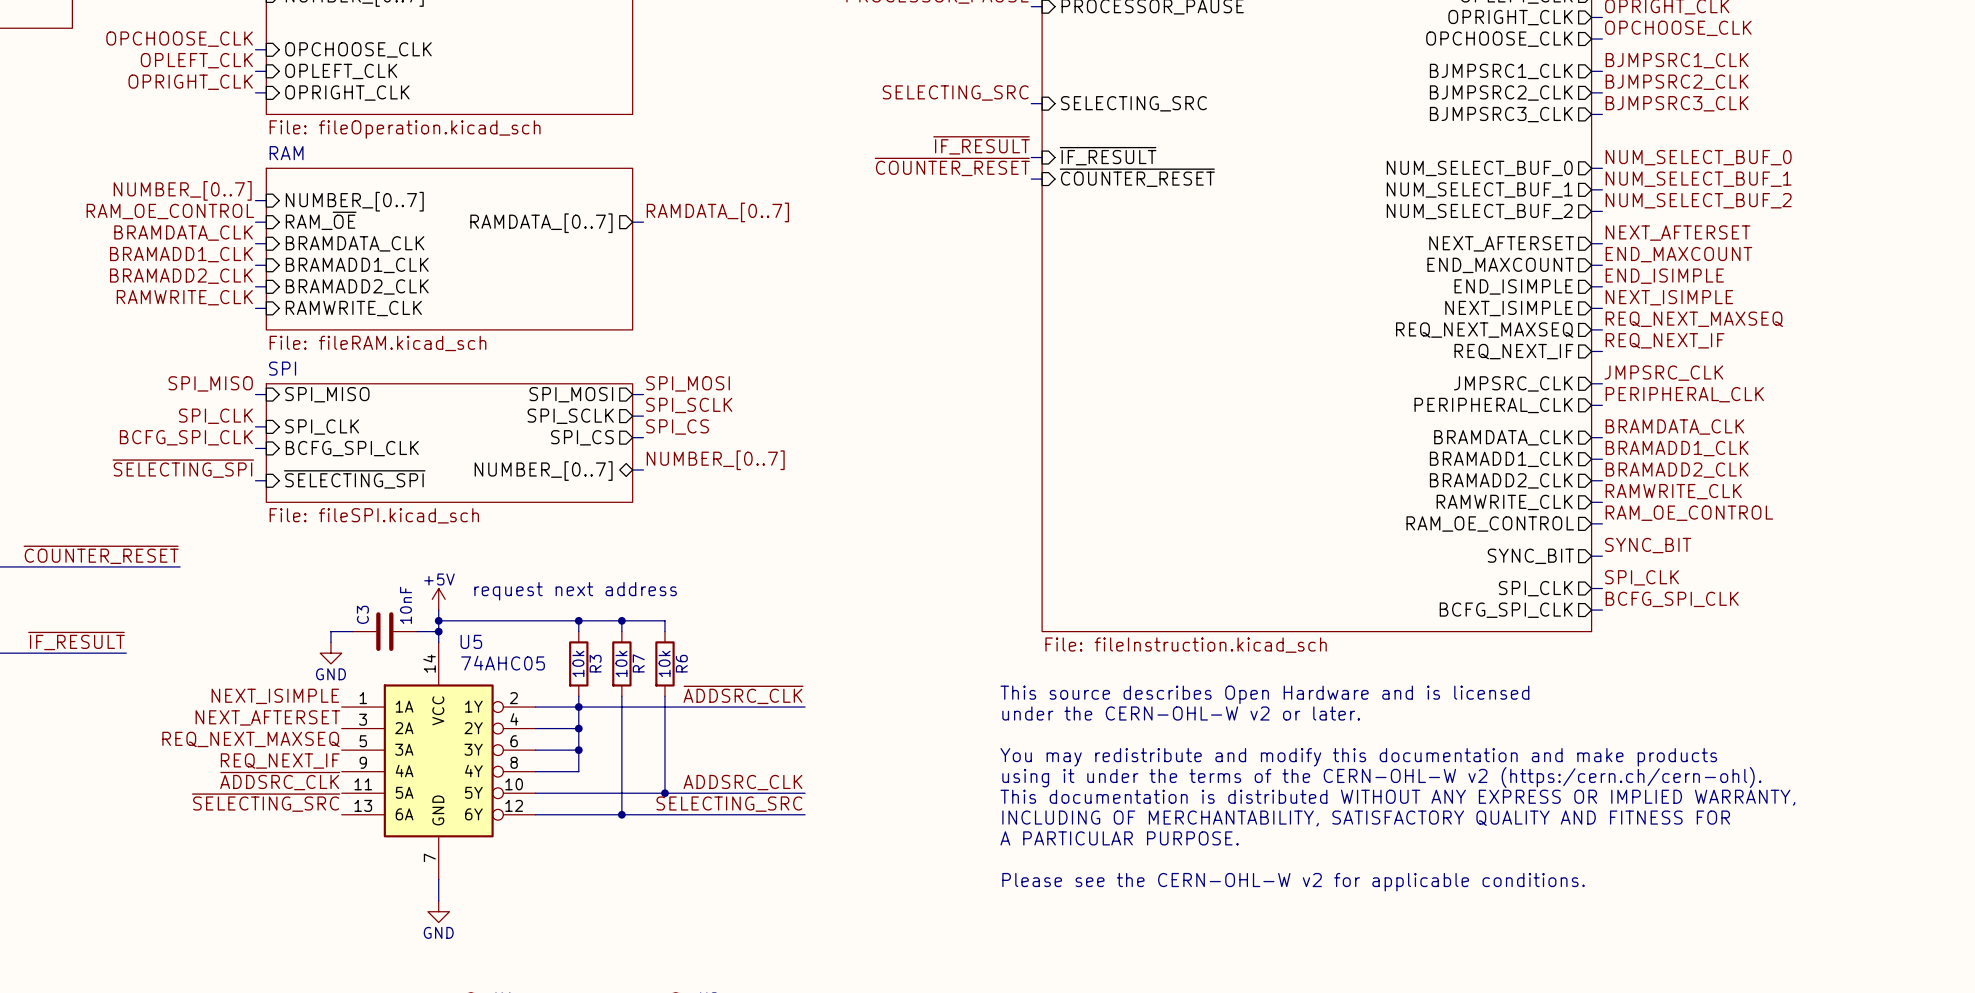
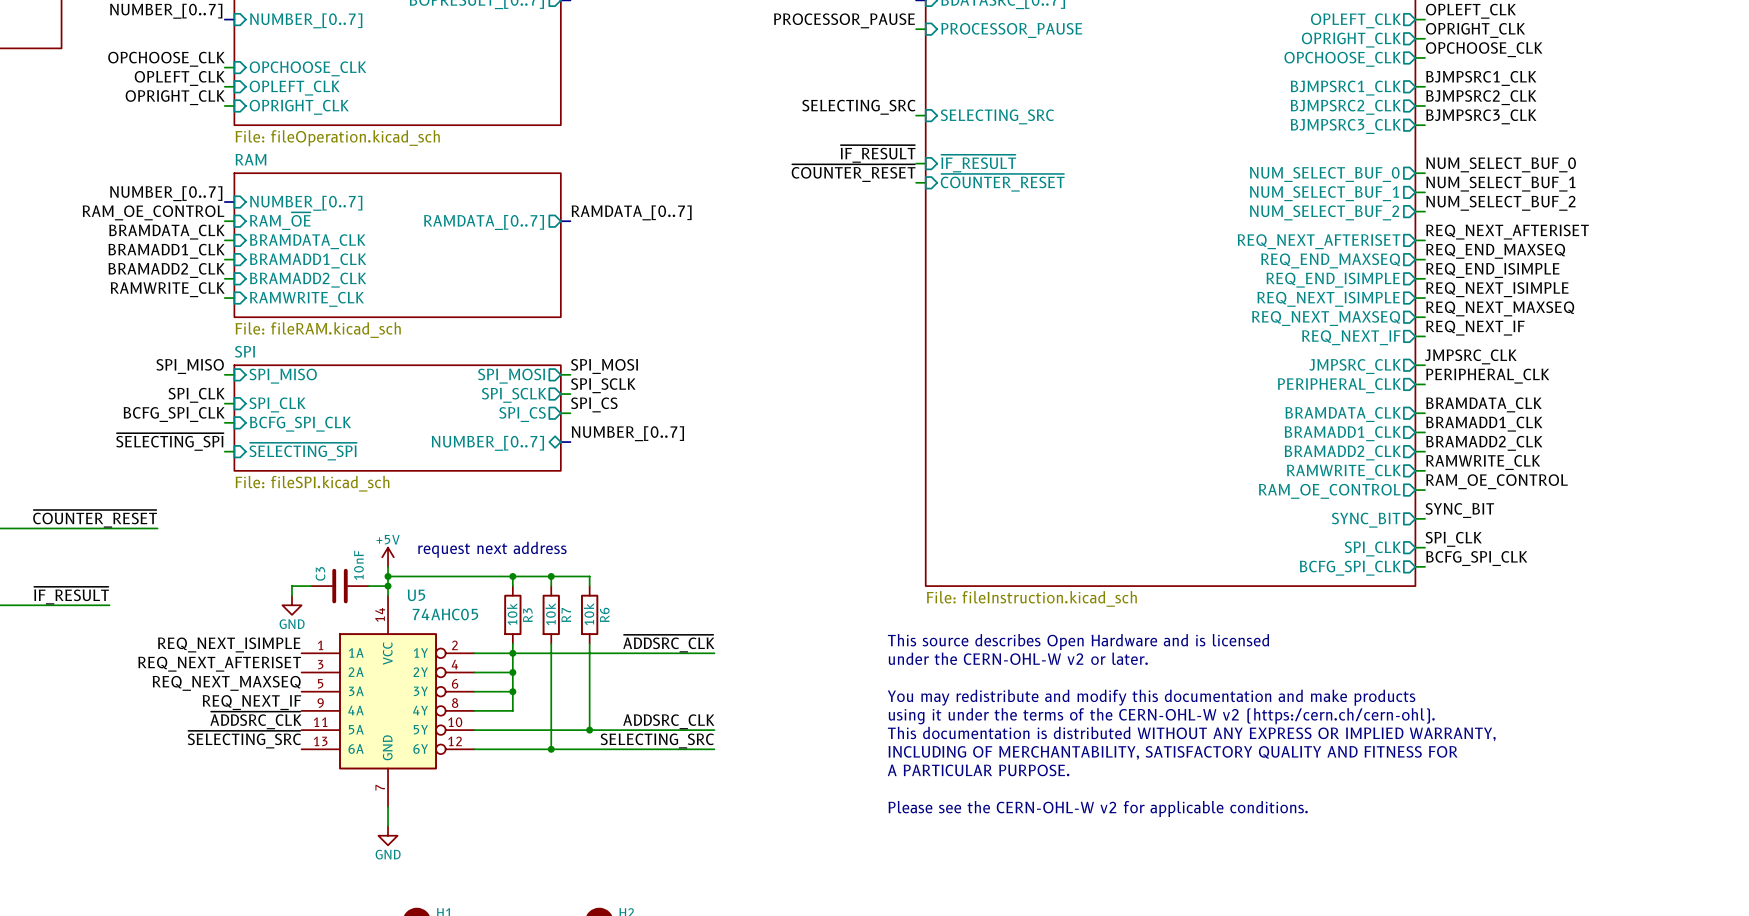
label: NEXT_AFTERSET (1678, 233) -> REQ_NEXT_AFTERISET (1507, 232)
sheet pin: NEXT_AFTERSET (1501, 243) -> REQ_NEXT_AFTERISET (1319, 241)
label: END_MAXCOUNT (1678, 254) -> REQ_END_MAXSEQ (1495, 251)
sheet pin: END_MAXCOUNT (1500, 265) -> REQ_END_MAXSEQ (1330, 260)
label: END_ISIMPLE (1664, 276) -> REQ_END_ISIMPLE (1492, 270)
sheet pin: END_ISIMPLE (1513, 286) -> REQ_END_ISIMPLE (1333, 280)
label: NEXT_ISIMPLE (1669, 297) -> REQ_NEXT_ISIMPLE (1497, 289)
sheet pin: NEXT_ISIMPLE (1509, 308) -> REQ_NEXT_ISIMPLE (1328, 299)
label: NEXT_ISIMPLE (275, 696) -> REQ_NEXT_ISIMPLE (229, 644)
label: NEXT_AFTERSET (267, 717) -> REQ_NEXT_AFTERISET (219, 664)

